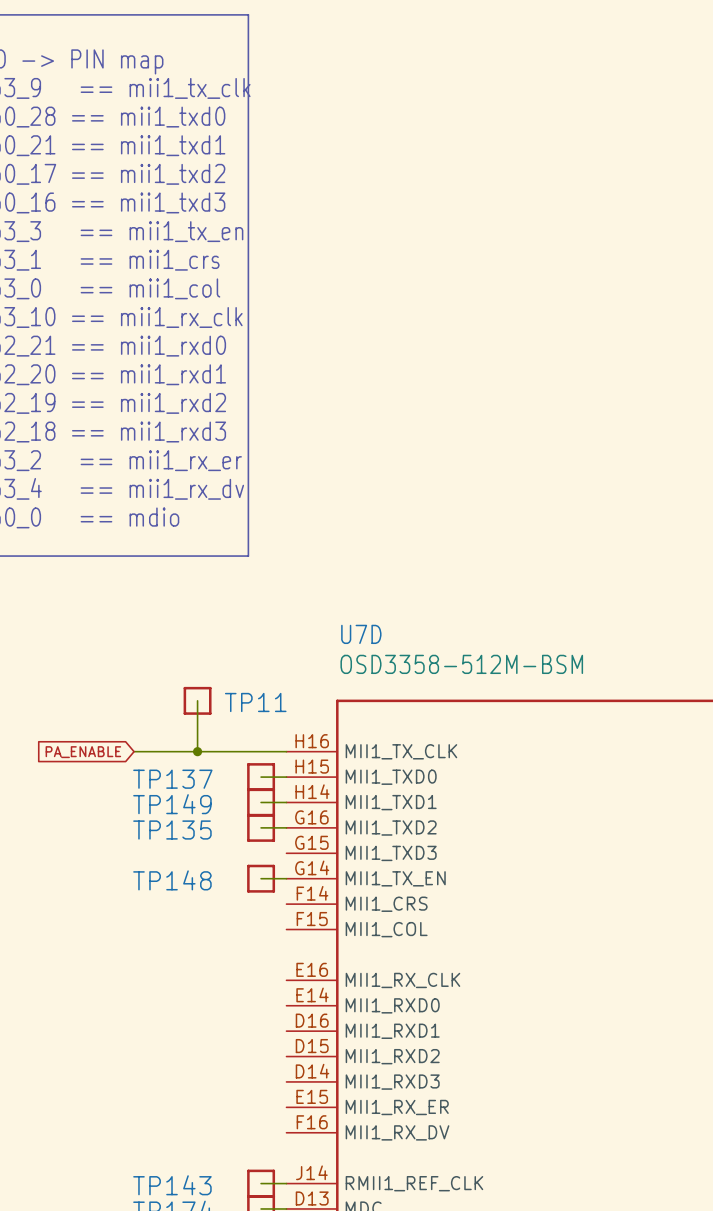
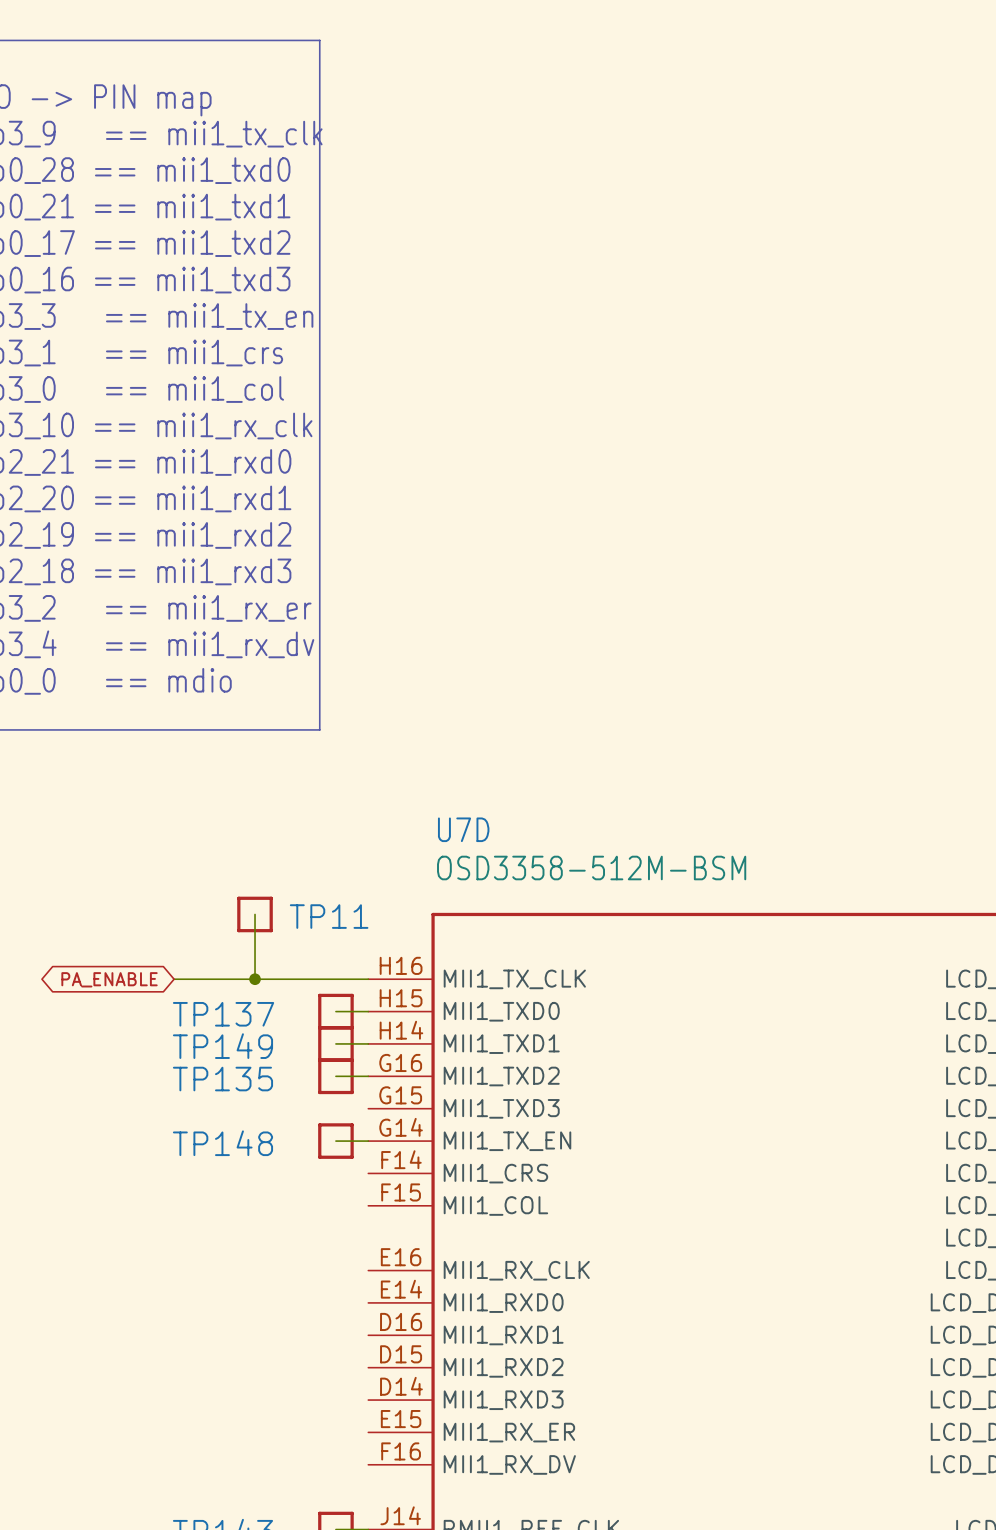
global label shape: input (83, 752) -> bidirectional (109, 979)

